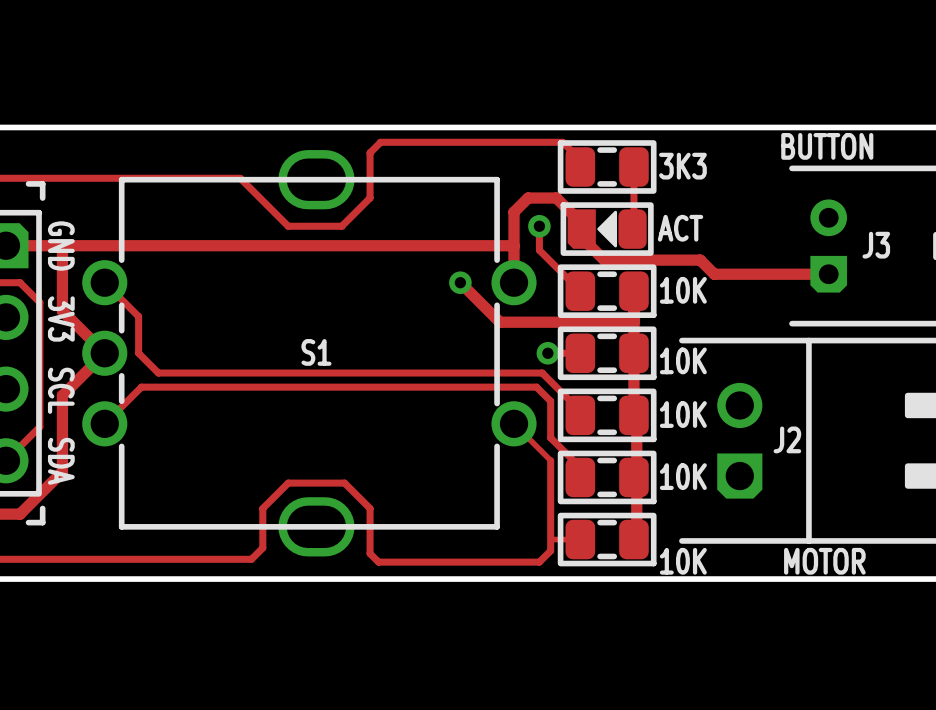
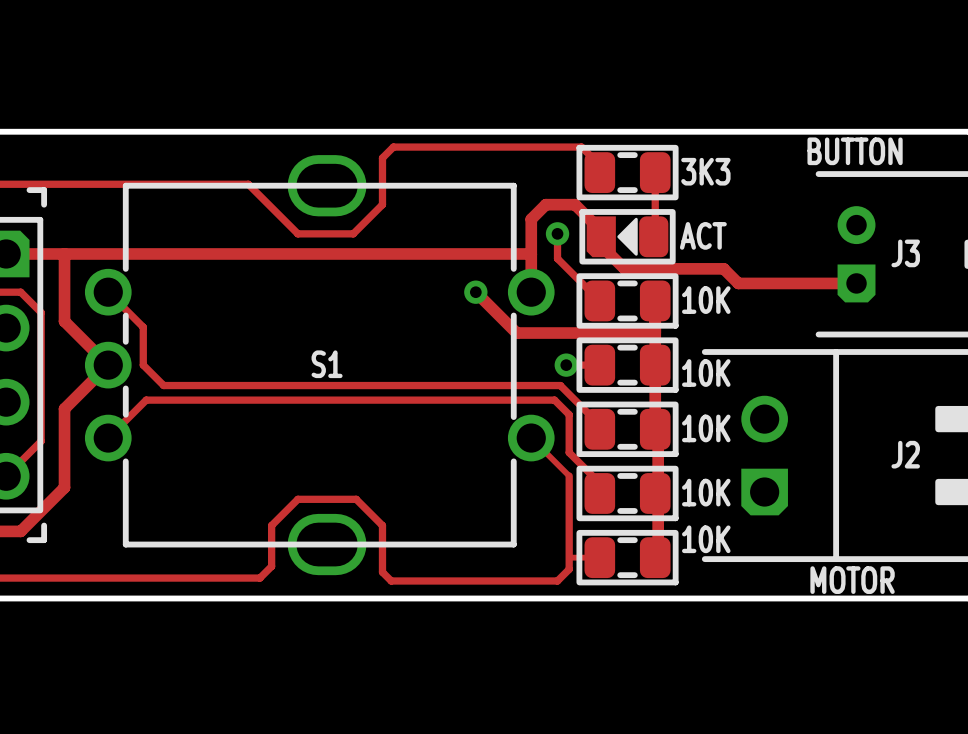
text: GND (61, 246) -> none
text: 3V3 (61, 318) -> none
text: SCL (61, 390) -> none
J2 name position: J2 (787, 439) -> J2 (905, 454)
text: SDA (61, 461) -> none
part value position: 10K (683, 561) -> 10K (706, 539)

